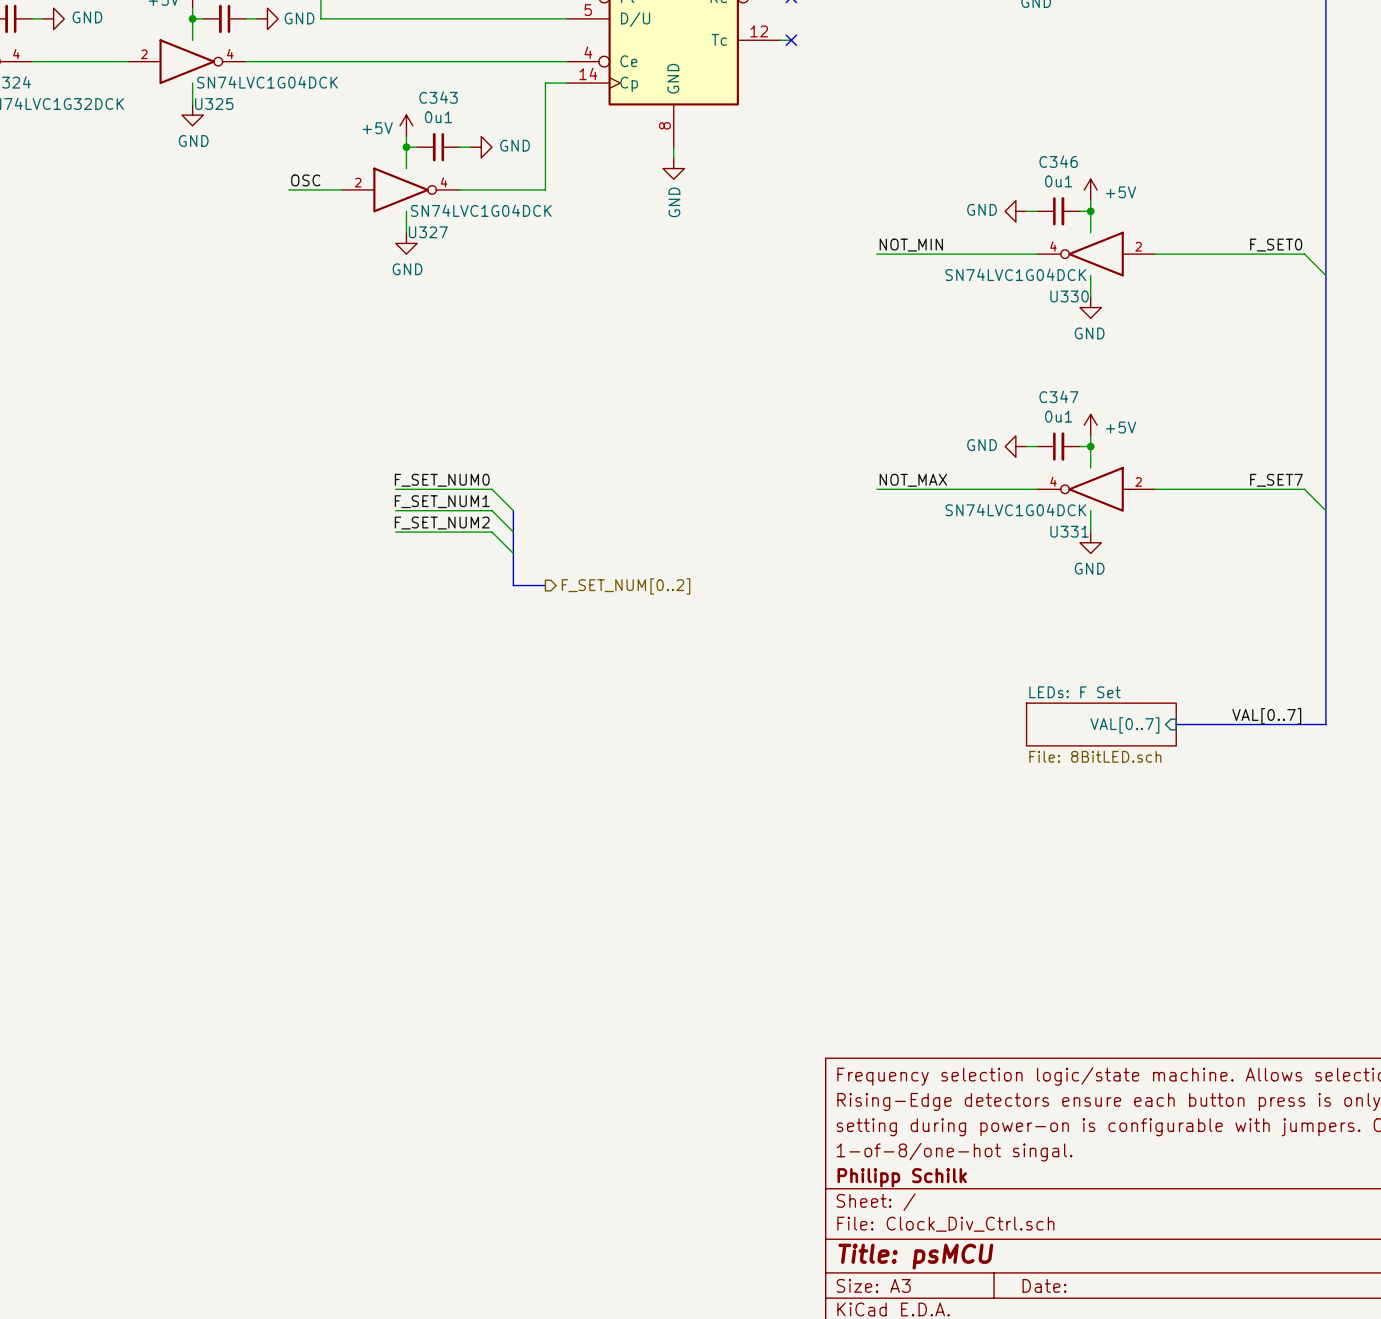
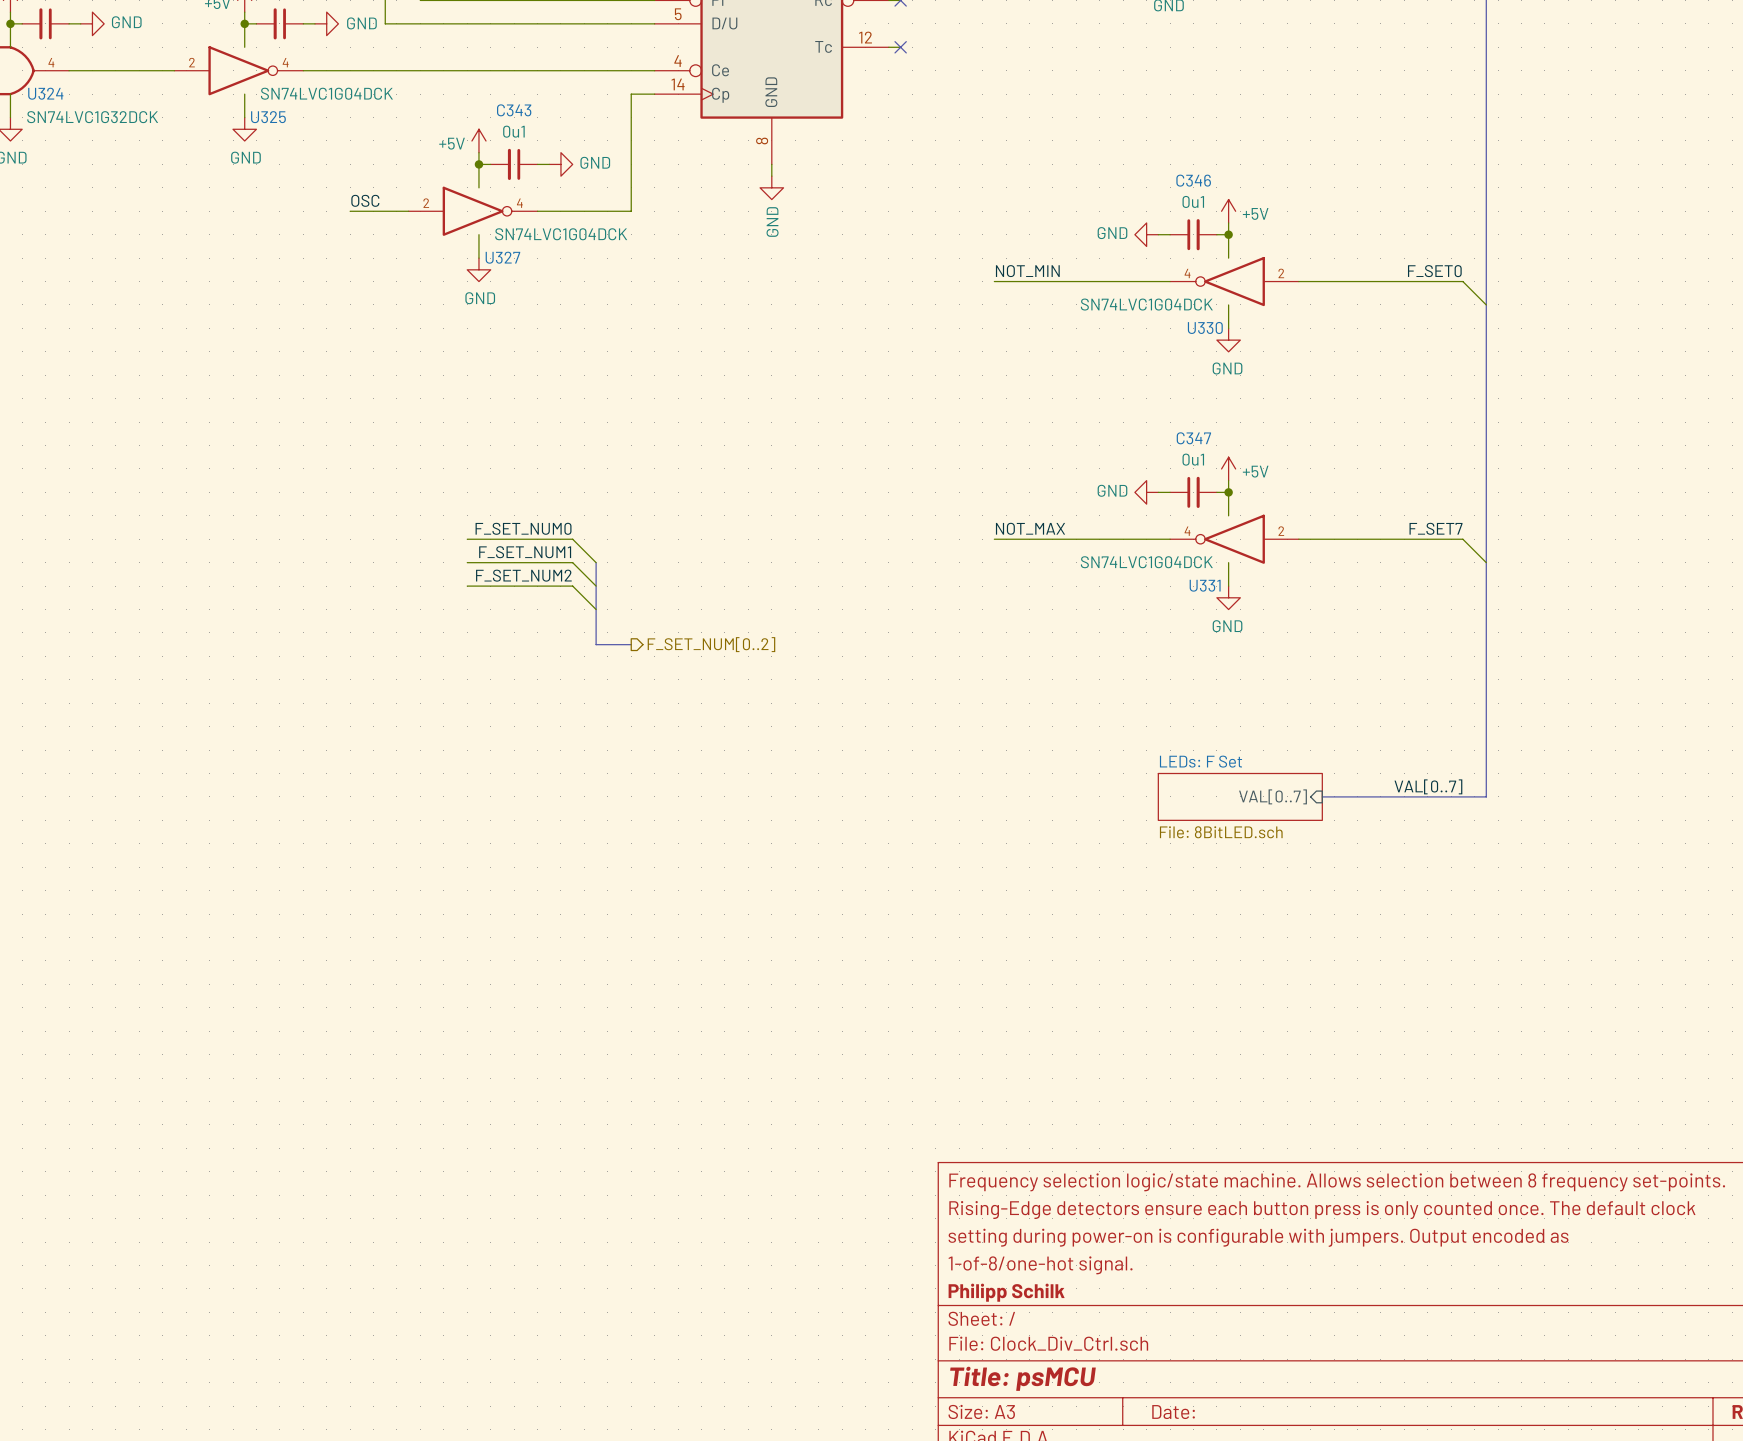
title block: 1-of-8/one-hot singal. (954, 1152) -> 1-of-8/one-hot signal. (1040, 1265)

